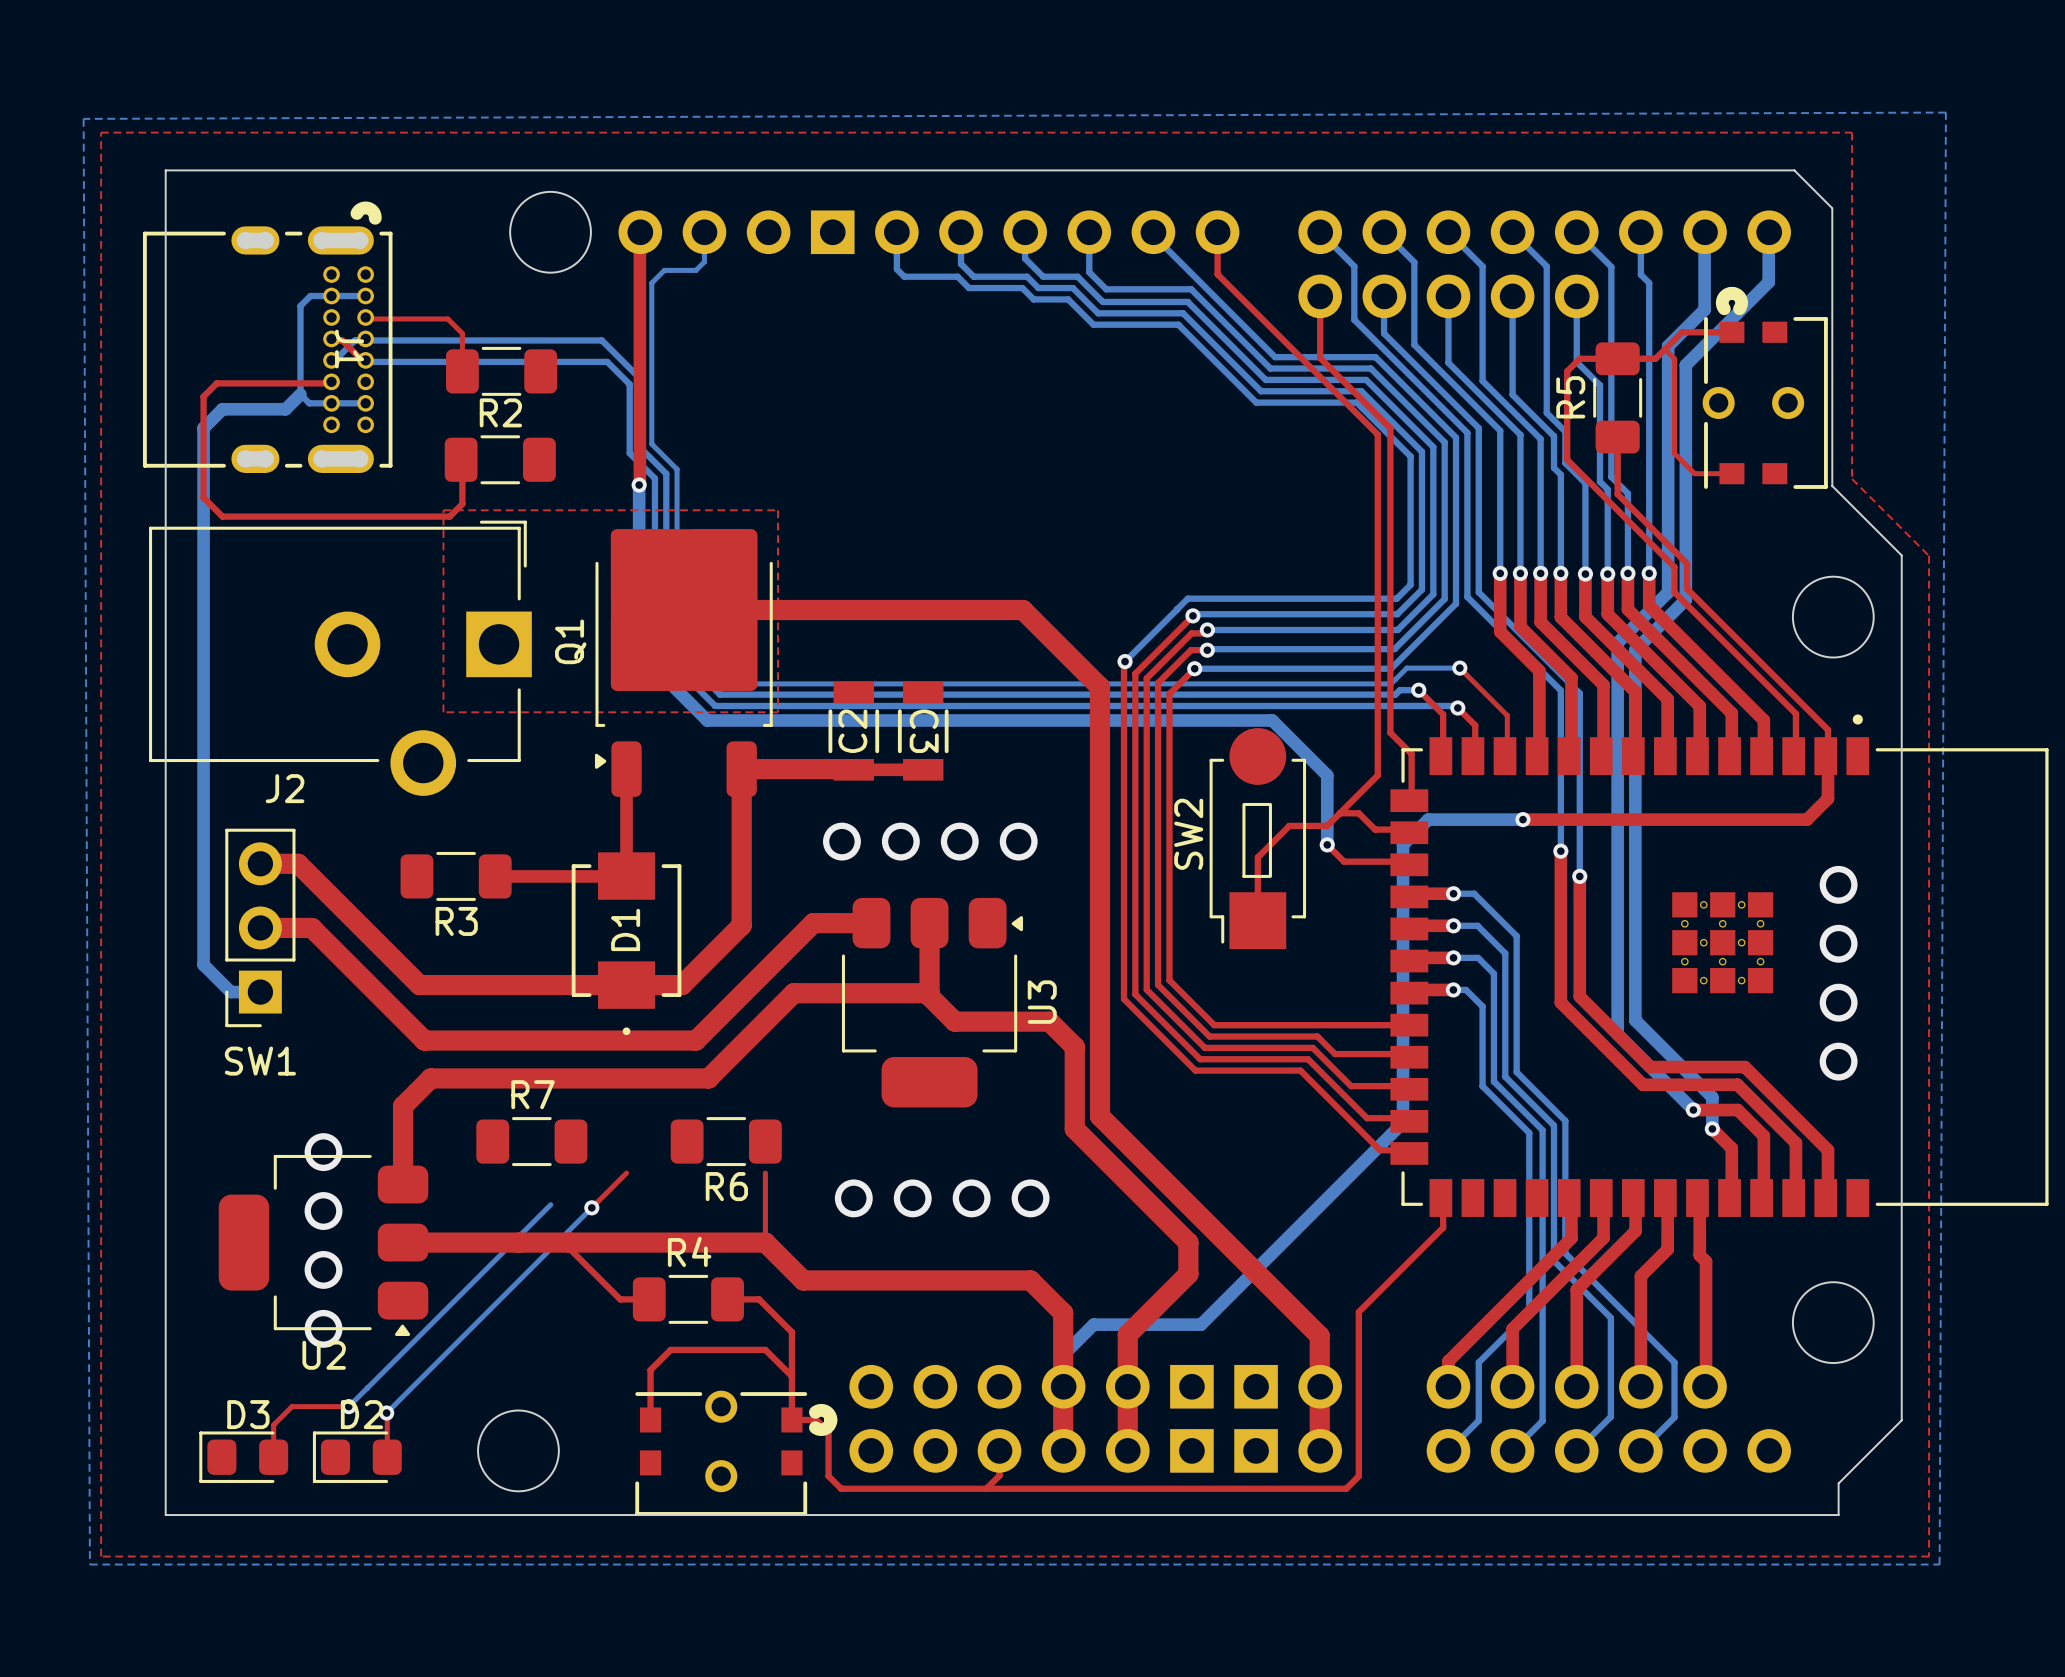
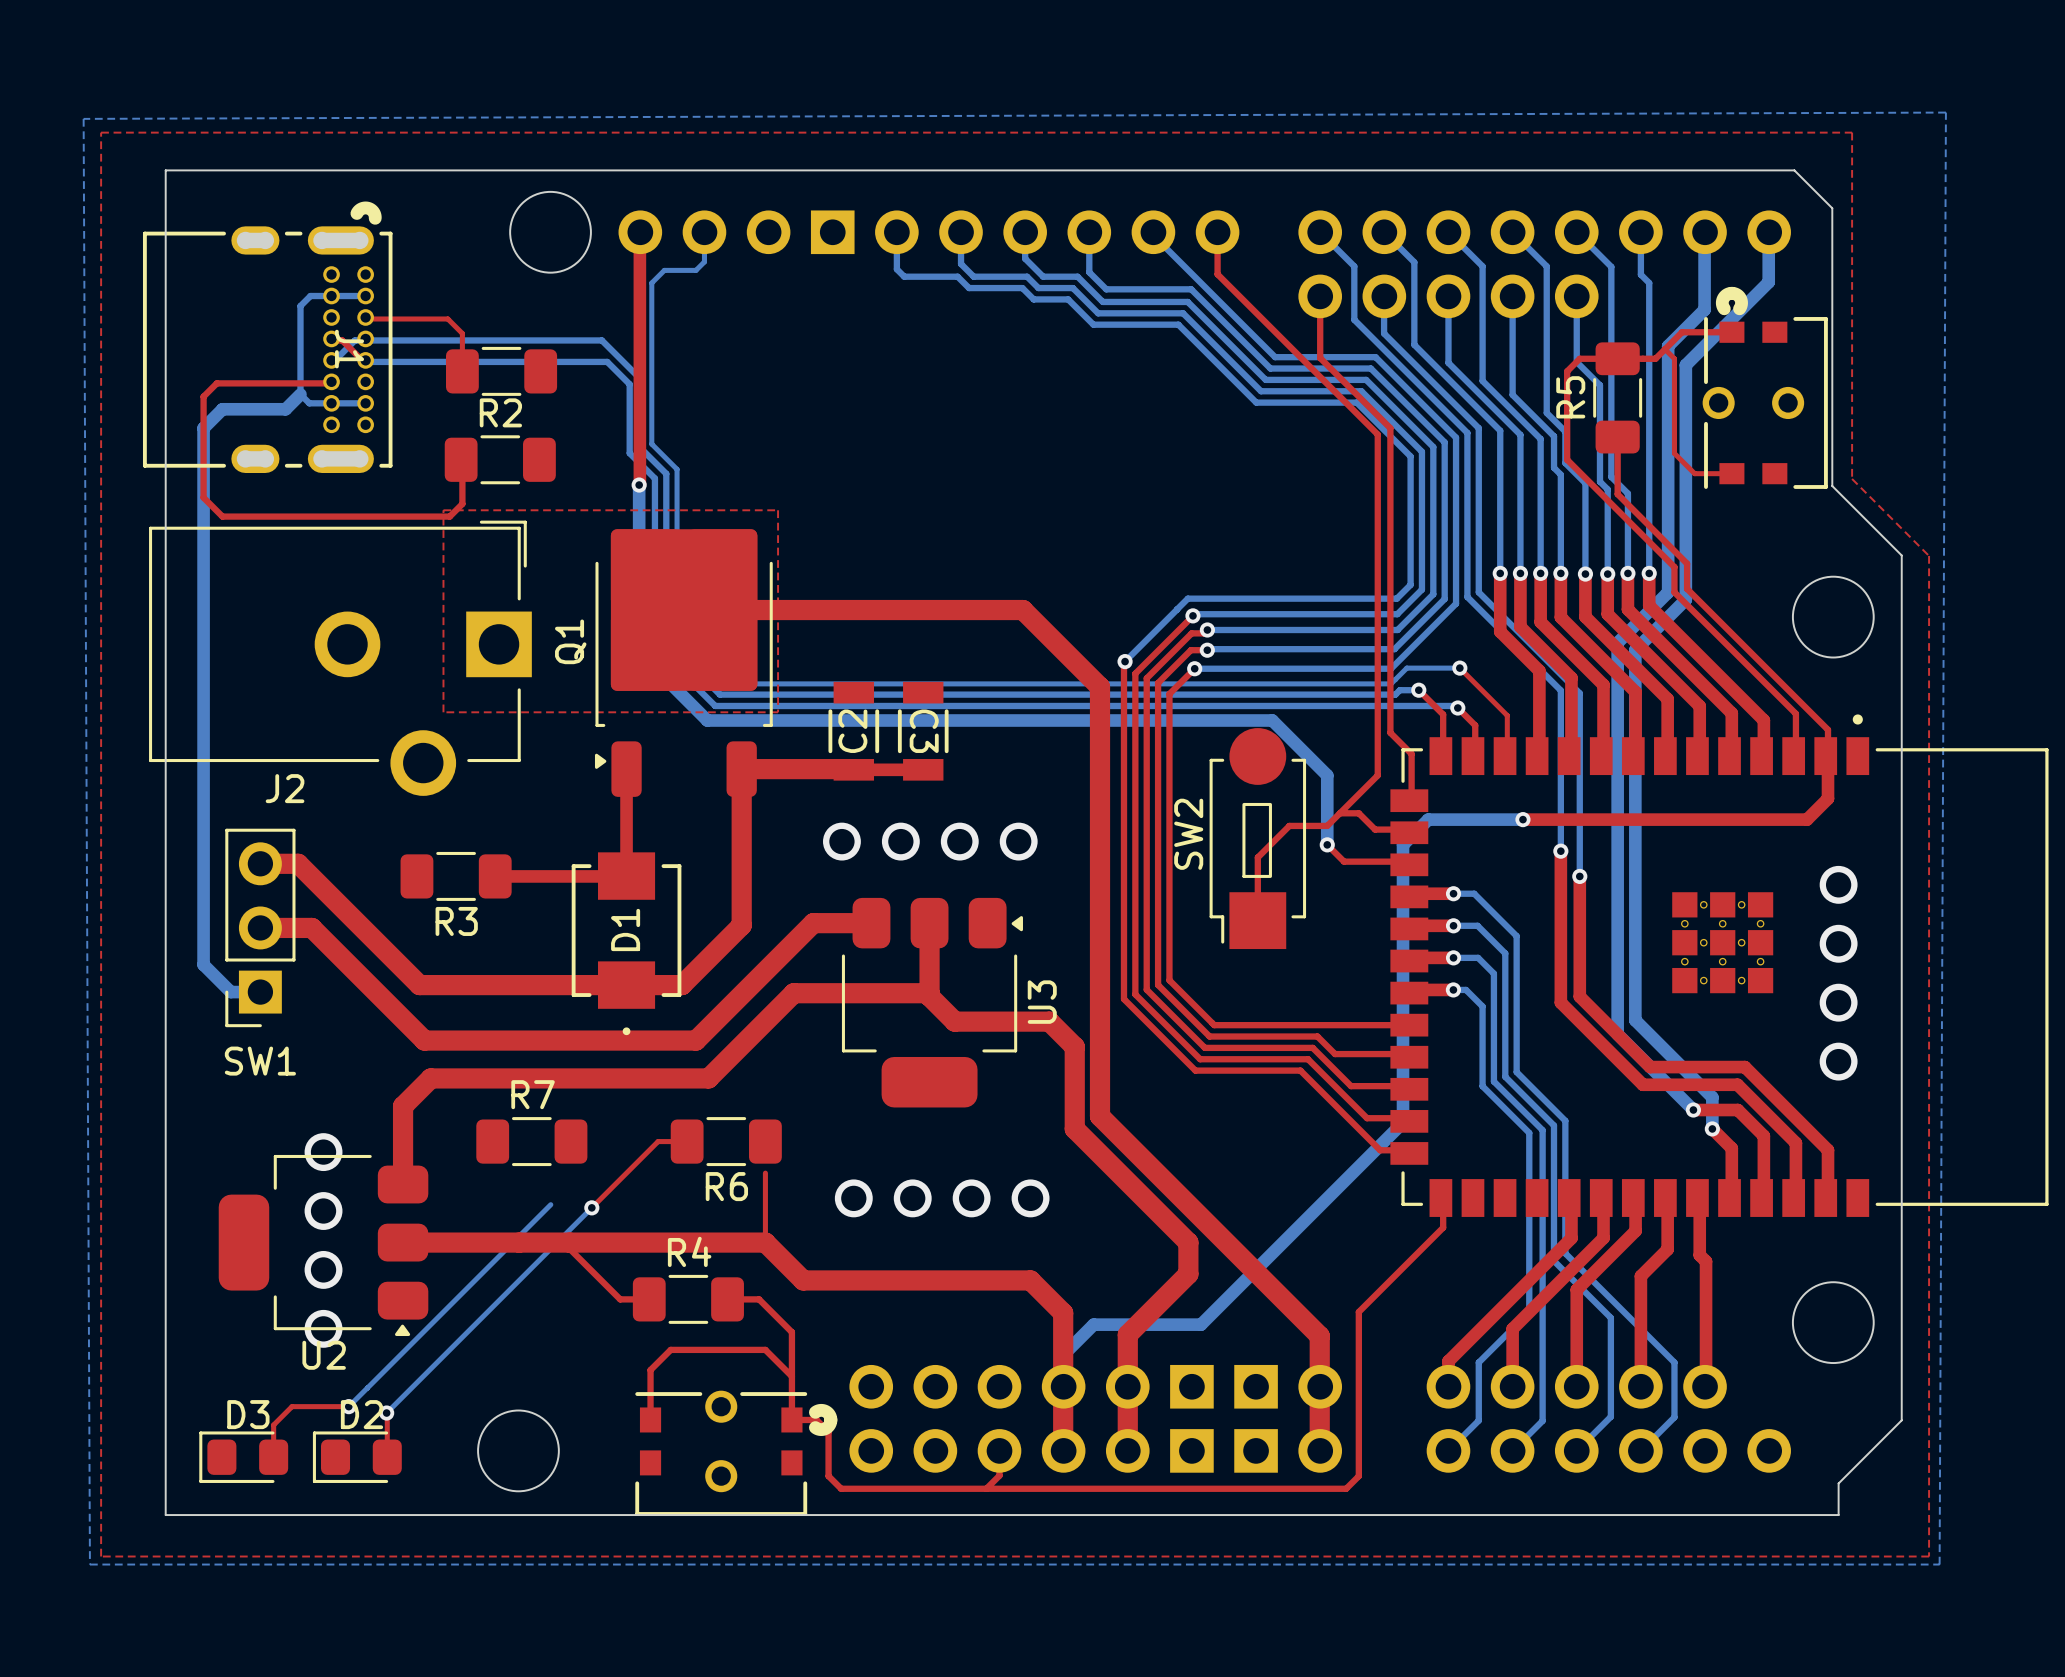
top track: none -> (687, 1141) (658, 1141) (626, 1173)

